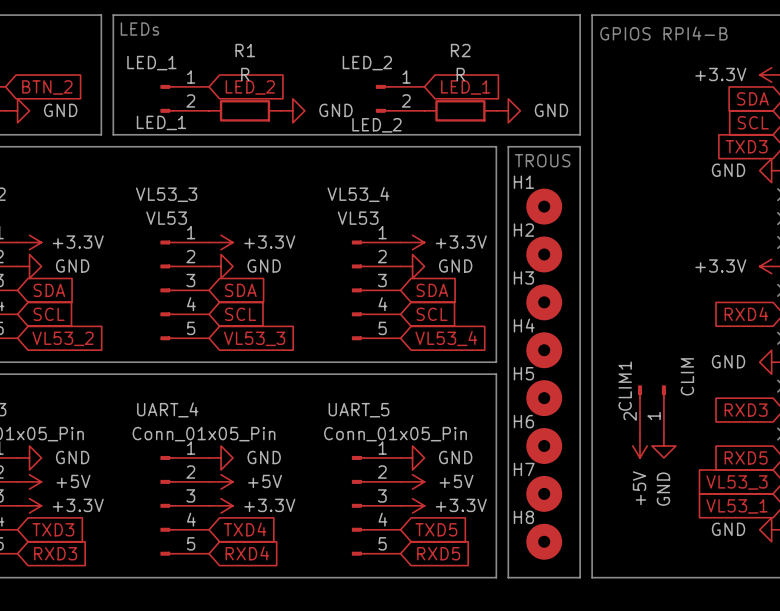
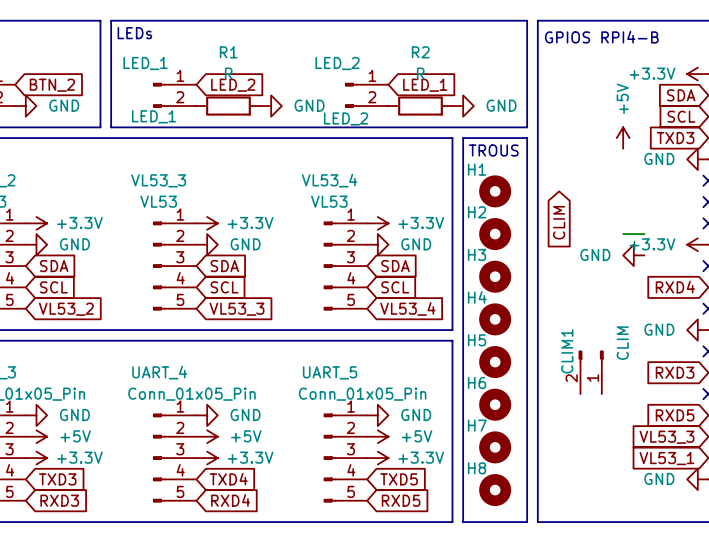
power symbol: none -> +5V (623, 138)
global label: none -> CLIM (559, 222)
wire: none -> (623, 234) (644, 234)
power symbol: none -> GND (633, 255)
power symbol: +5V (639, 445) -> none
power symbol: GND (663, 445) -> none

